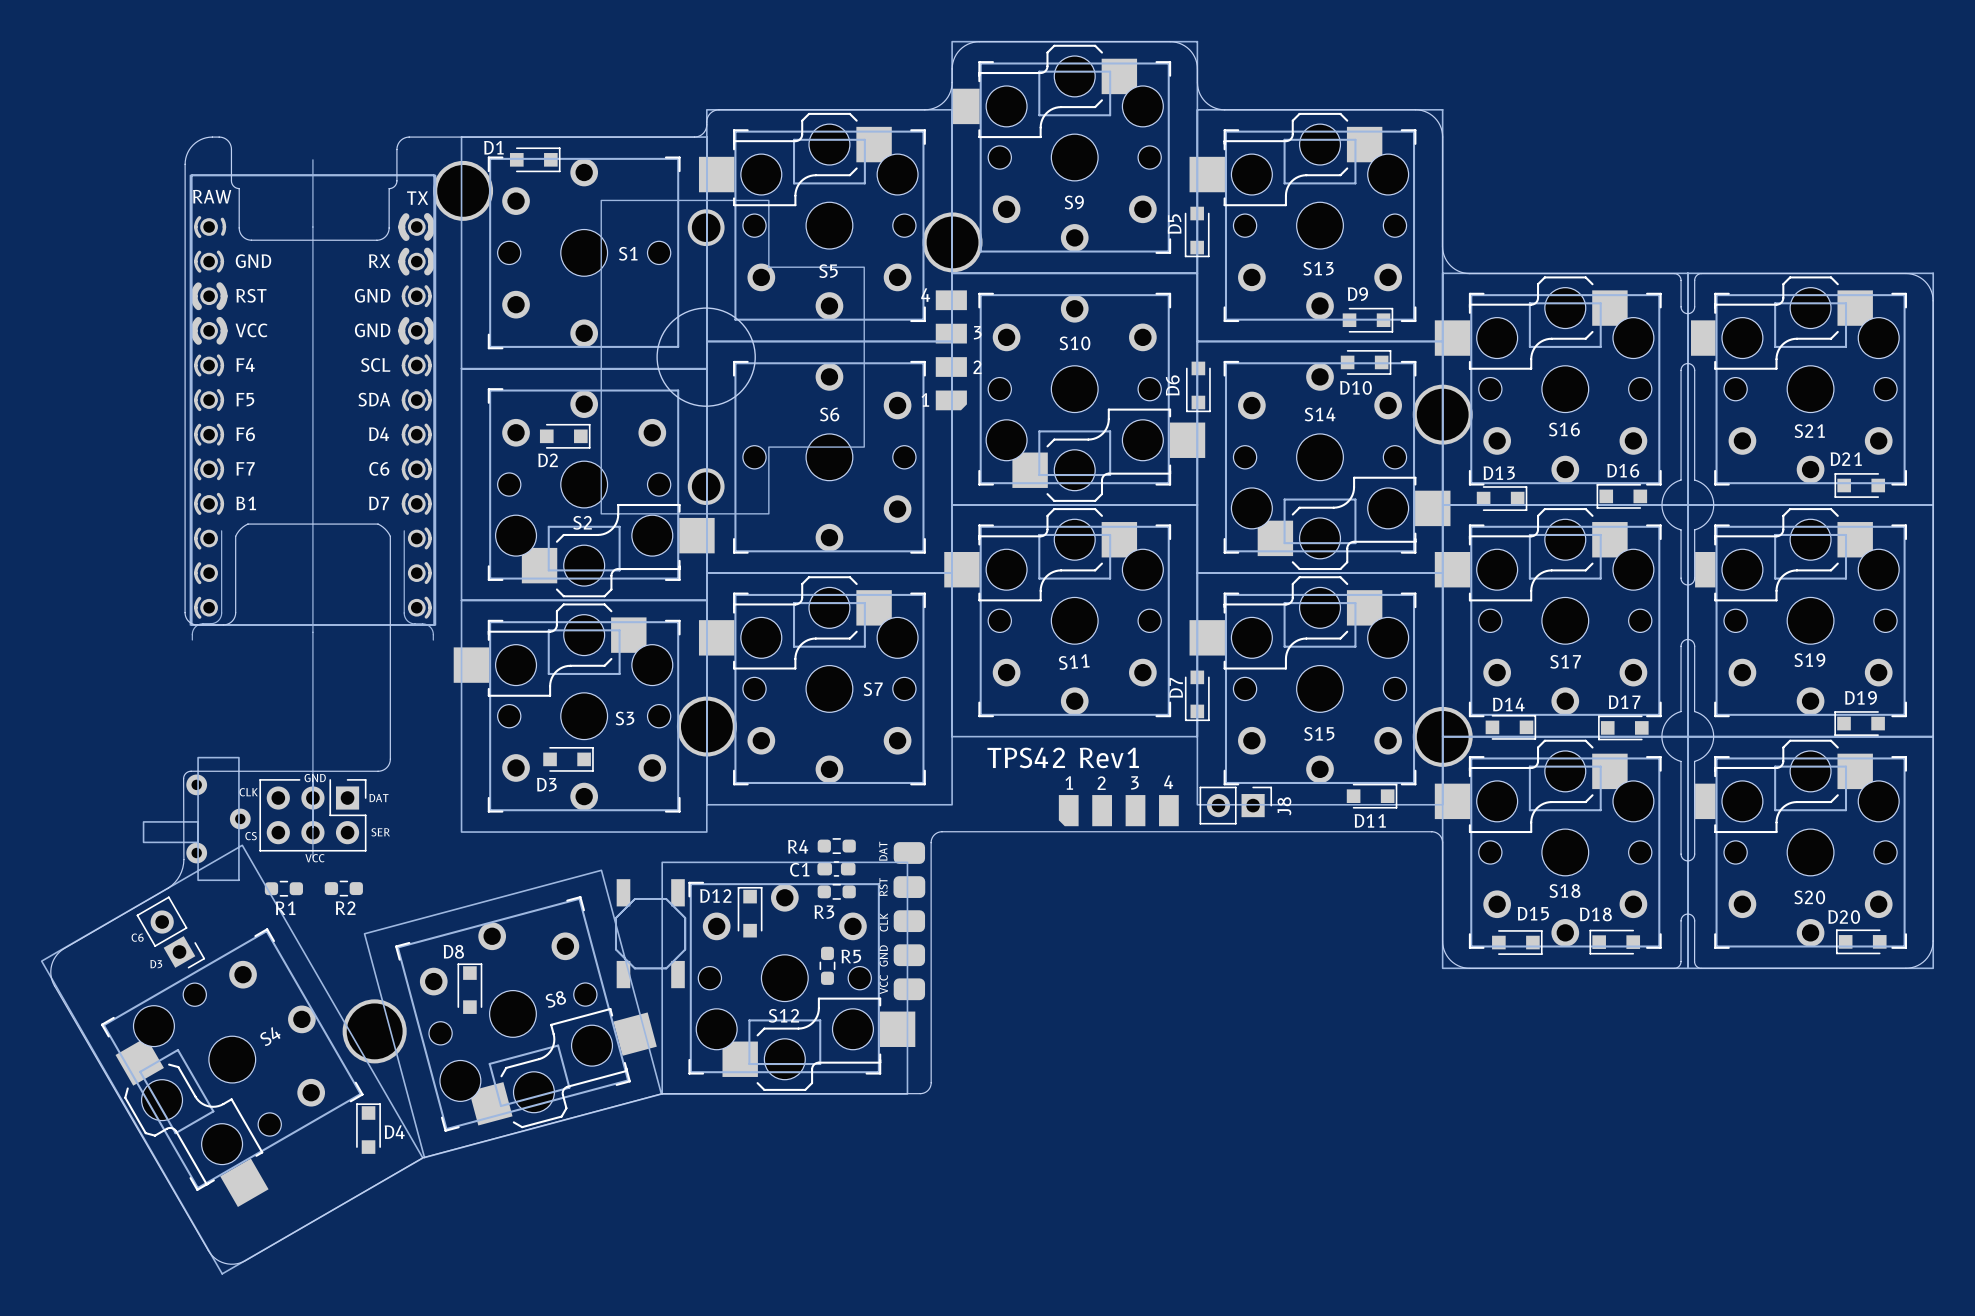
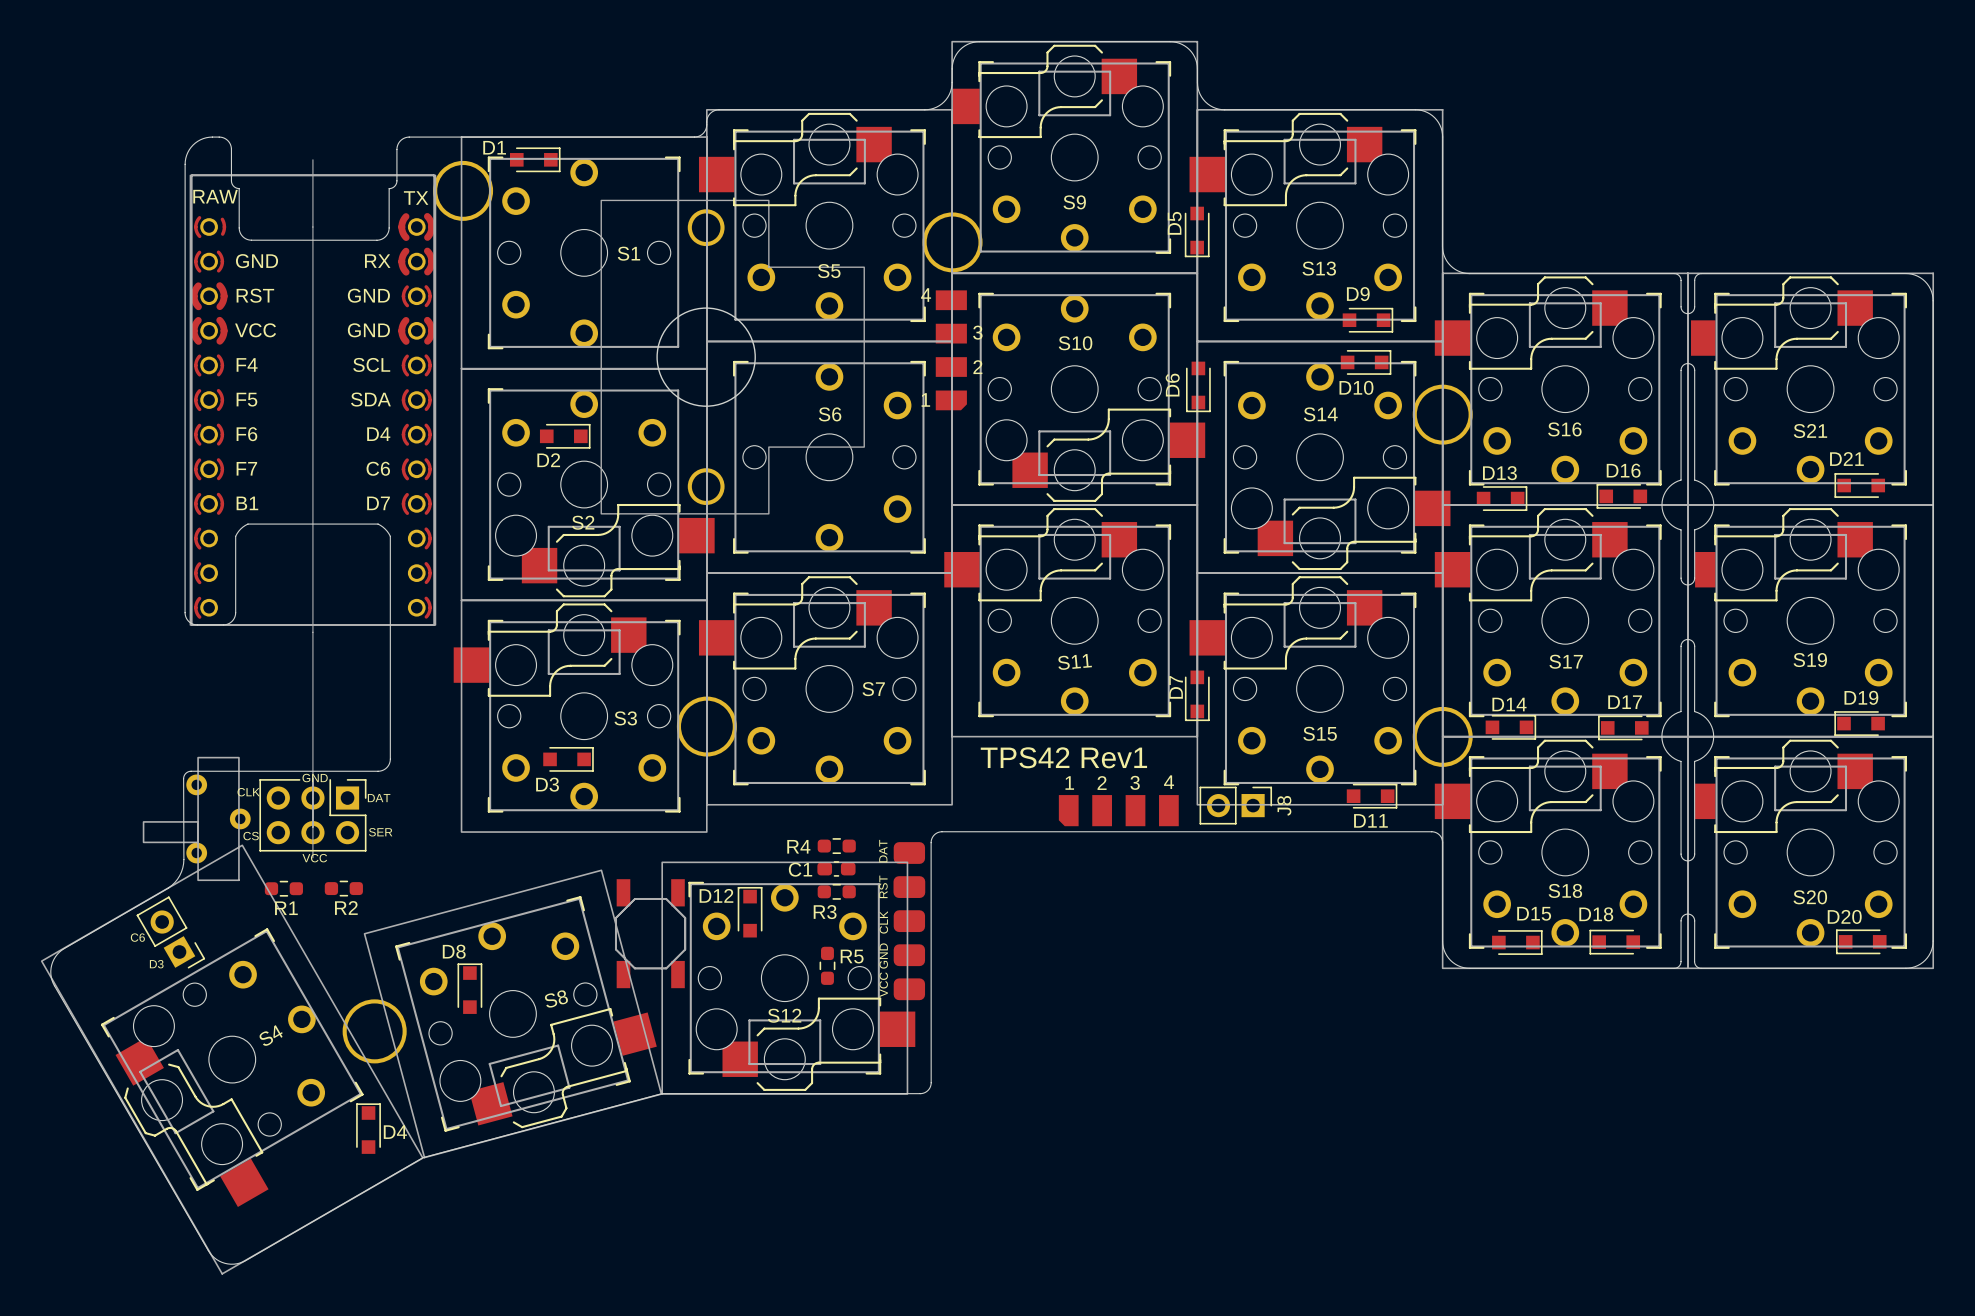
part footprint: [190, 159, 437, 641] -> [190, 159, 437, 633]

